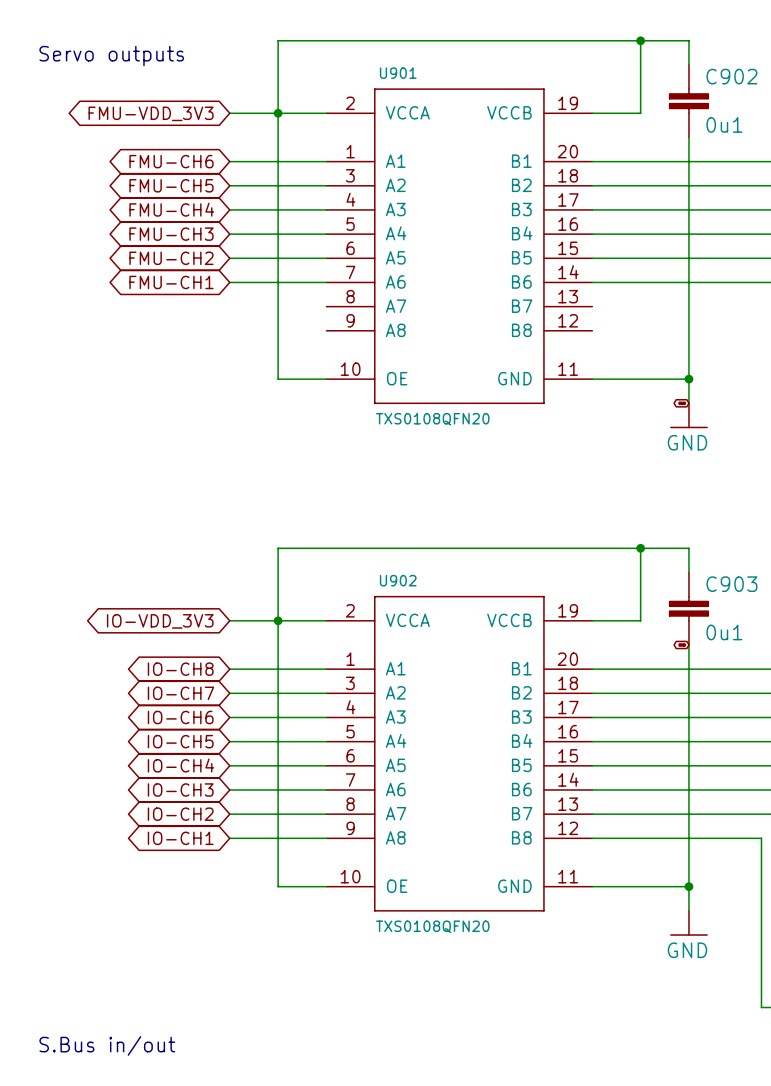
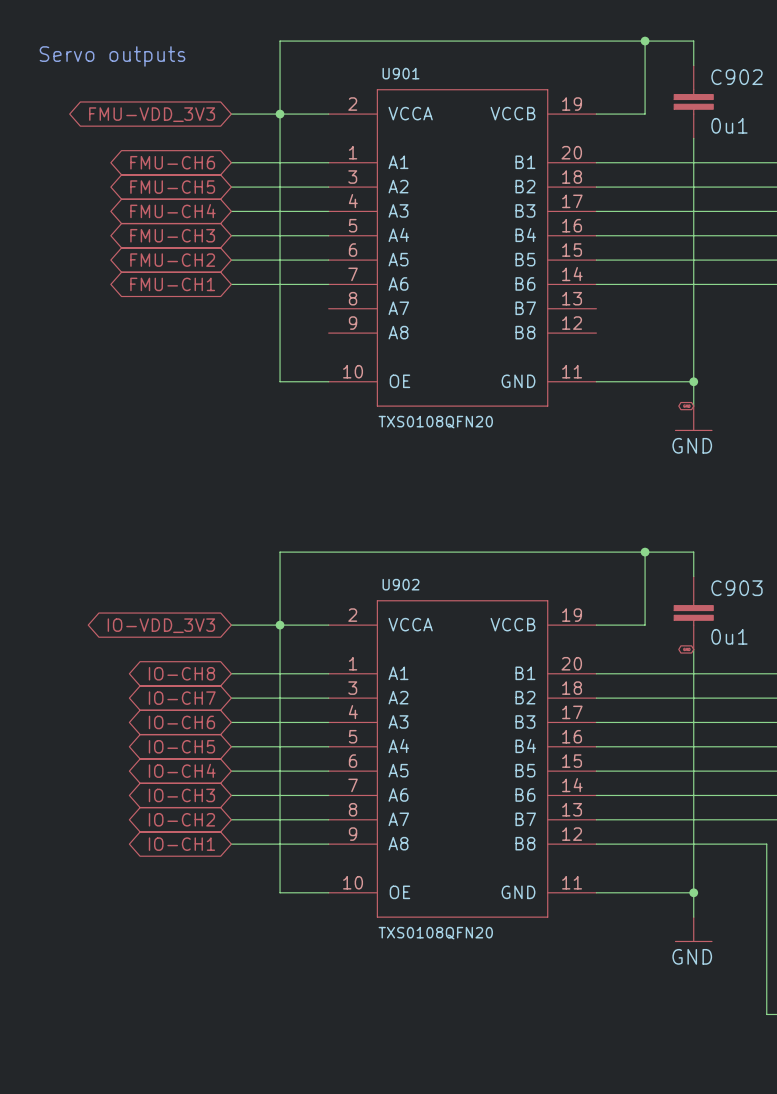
text: S.Bus in/out (107, 1045) -> none

